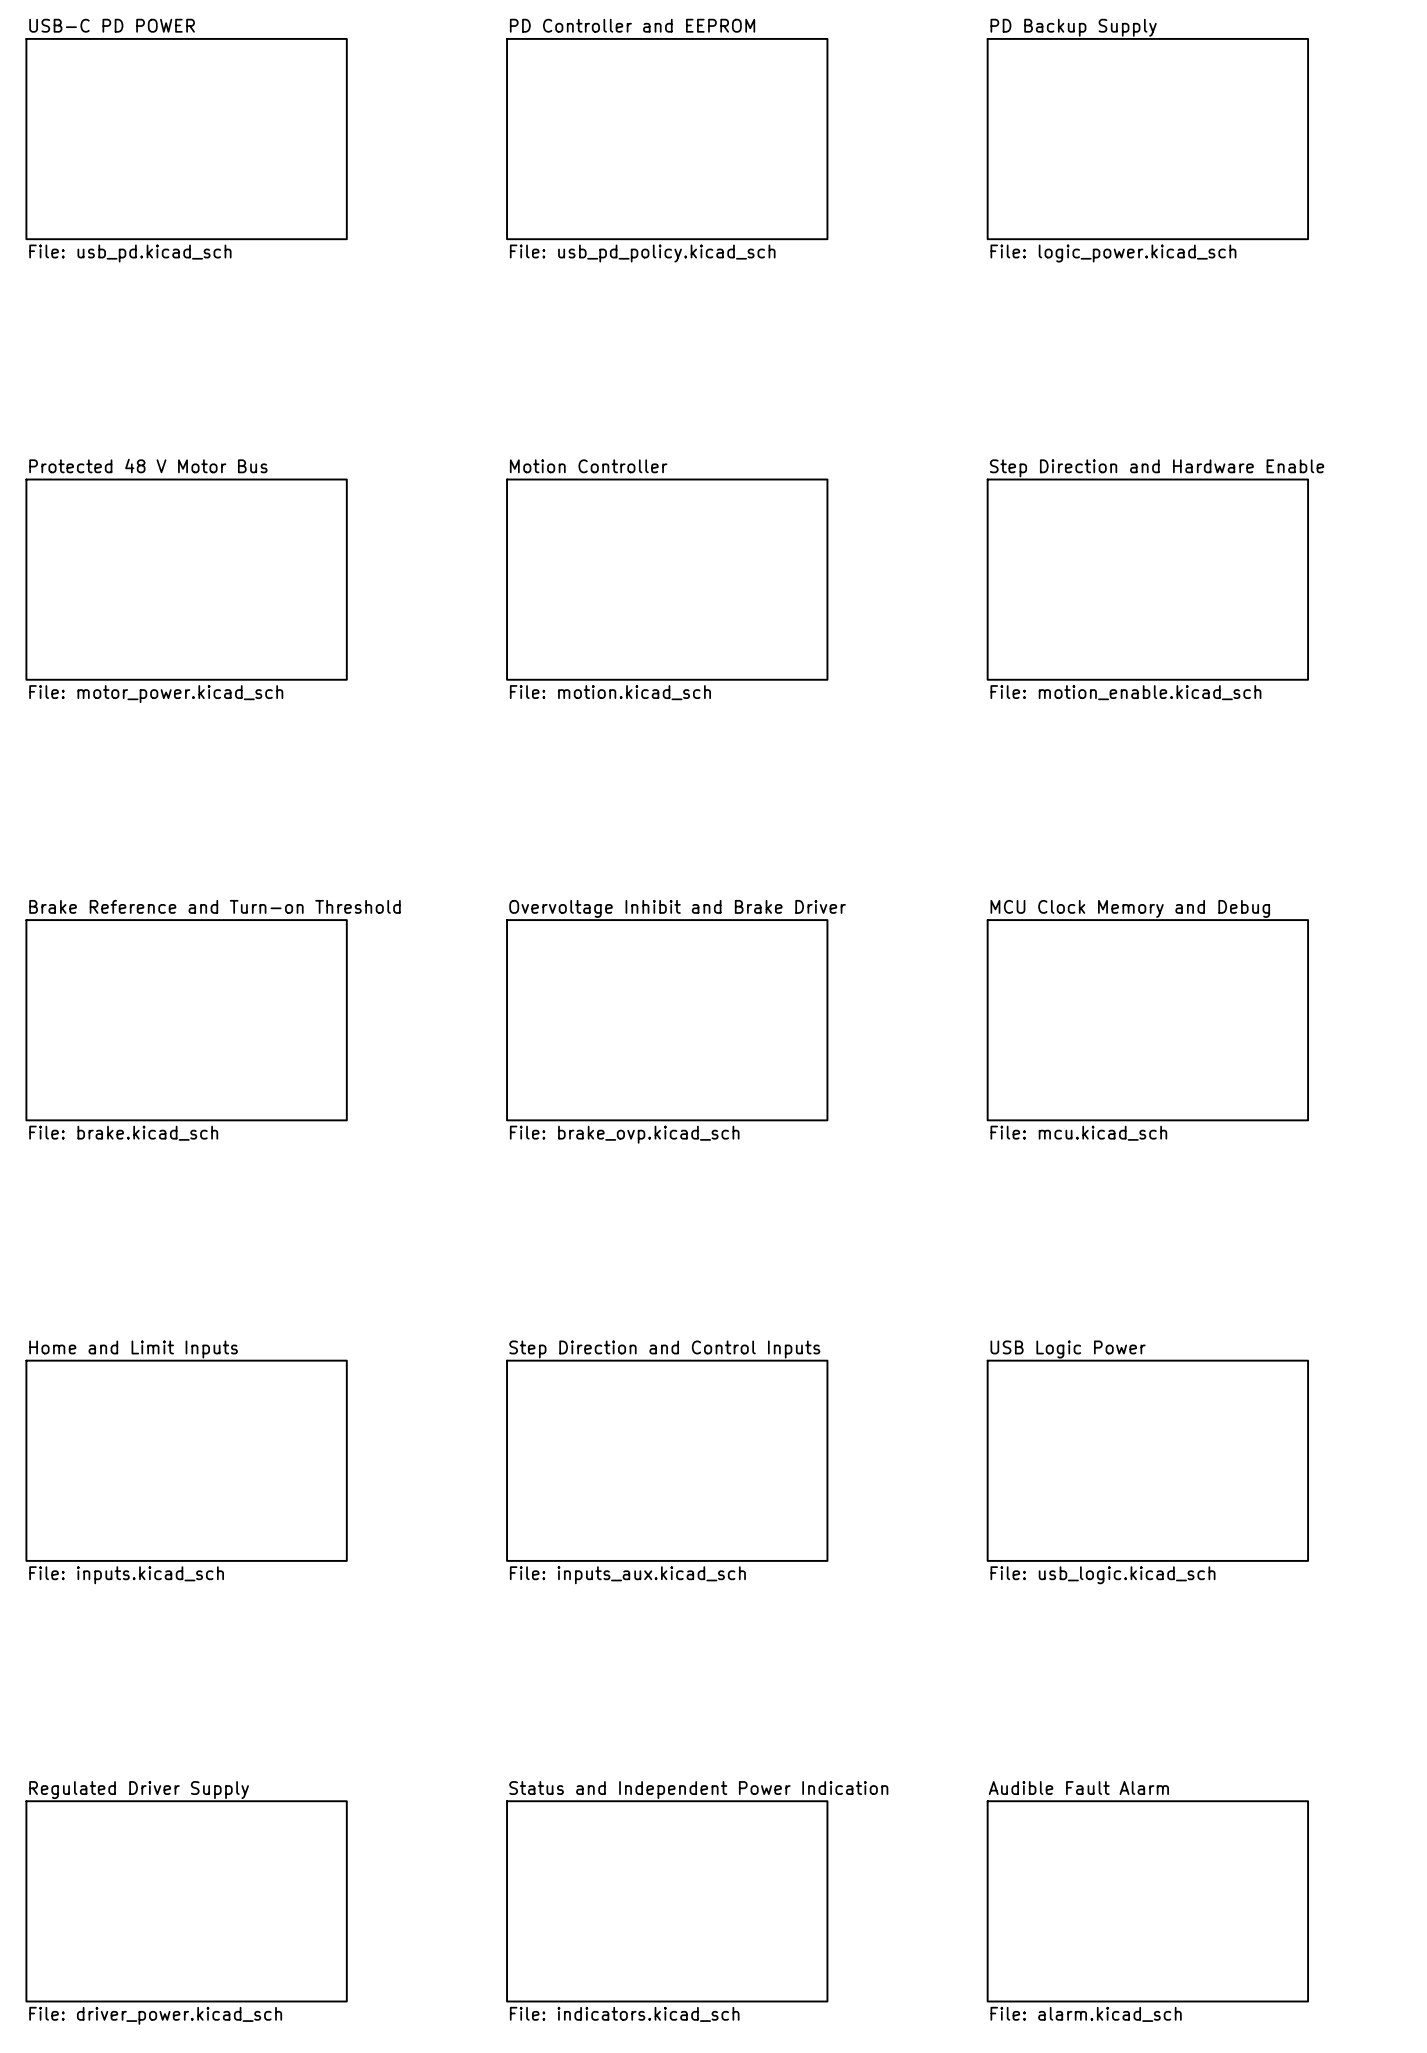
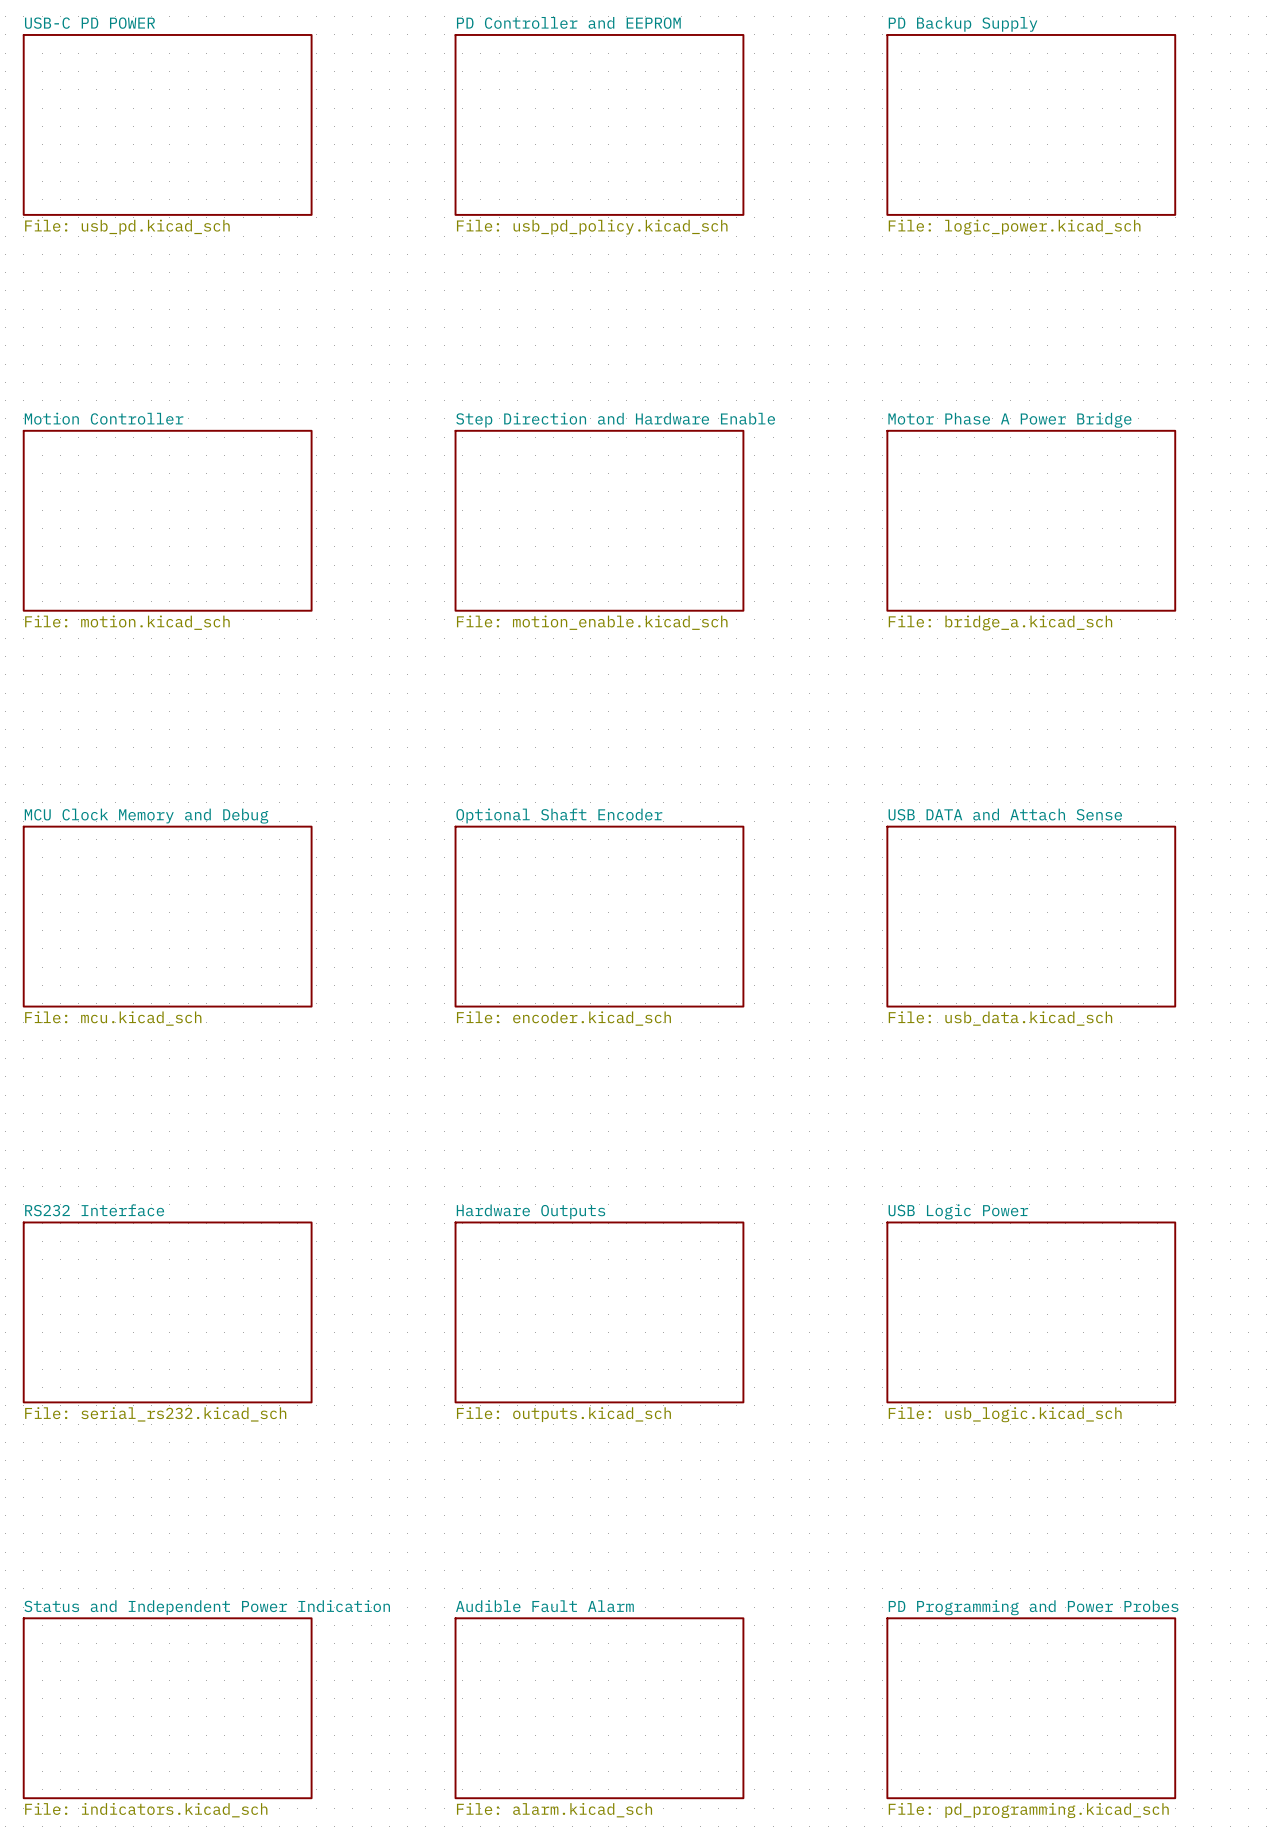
sheet Protected 48 V Motor Bus name: Protected 48 V Motor Bus (148, 466) -> Motion Controller (104, 418)
sheet Motion Controller name: Motion Controller (588, 466) -> Step Direction and Hardware Enable (615, 420)
sheet Step Direction and Hardware Enable name: Step Direction and Hardware Enable (1157, 468) -> Motor Phase A Power Bridge (1009, 420)
sheet Motion Controller value: File: motion.kicad_sch (610, 692) -> File: motion_enable.kicad_sch (592, 622)
sheet Step Direction and Hardware Enable value: File: motion_enable.kicad_sch (1125, 692) -> File: bridge_a.kicad_sch (1000, 623)
sheet Protected 48 V Motor Bus value: File: motor_power.kicad_sch (156, 694) -> File: motion.kicad_sch (127, 622)
sheet Brake Reference and Turn-on Threshold name: Brake Reference and Turn-on Threshold (214, 906) -> MCU Clock Memory and Debug (146, 816)
sheet Overvoltage Inhibit and Brake Driver name: Overvoltage Inhibit and Brake Driver (677, 908) -> Optional Shaft Encoder (559, 815)
sheet MCU Clock Memory and Debug name: MCU Clock Memory and Debug (1130, 908) -> USB DATA and Attach Sense (1005, 814)
sheet Brake Reference and Turn-on Threshold value: File: brake.kicad_sch (123, 1133) -> File: mcu.kicad_sch (113, 1018)
sheet MCU Clock Memory and Debug value: File: mcu.kicad_sch (1078, 1133) -> File: usb_data.kicad_sch (1000, 1018)
sheet Overvoltage Inhibit and Brake Driver value: File: brake_ovp.kicad_sch (624, 1134) -> File: encoder.kicad_sch (563, 1018)
sheet Home and Limit Inputs name: Home and Limit Inputs (133, 1349) -> RS232 Interface (94, 1210)
sheet Step Direction and Control Inputs name: Step Direction and Control Inputs (664, 1349) -> Hardware Outputs (530, 1211)
sheet Home and Limit Inputs value: File: inputs.kicad_sch (126, 1575) -> File: serial_rs232.kicad_sch (155, 1414)
sheet Step Direction and Control Inputs value: File: inputs_aux.kicad_sch (627, 1575) -> File: outputs.kicad_sch (563, 1414)
sheet Audible Fault Alarm name: Audible Fault Alarm (1078, 1788) -> PD Programming and Power Probes (1033, 1607)
sheet Regulated Driver Supply name: Regulated Driver Supply (139, 1790) -> Status and Independent Power Indication (207, 1607)
sheet Status and Independent Power Indication name: Status and Independent Power Indication (698, 1790) -> Audible Fault Alarm (544, 1606)
sheet Status and Independent Power Indication value: File: indicators.kicad_sch (624, 2014) -> File: alarm.kicad_sch (554, 1810)
sheet Audible Fault Alarm value: File: alarm.kicad_sch (1086, 2014) -> File: pd_programming.kicad_sch (1028, 1810)
sheet Regulated Driver Supply value: File: driver_power.kicad_sch (155, 2015) -> File: indicators.kicad_sch (146, 1810)

